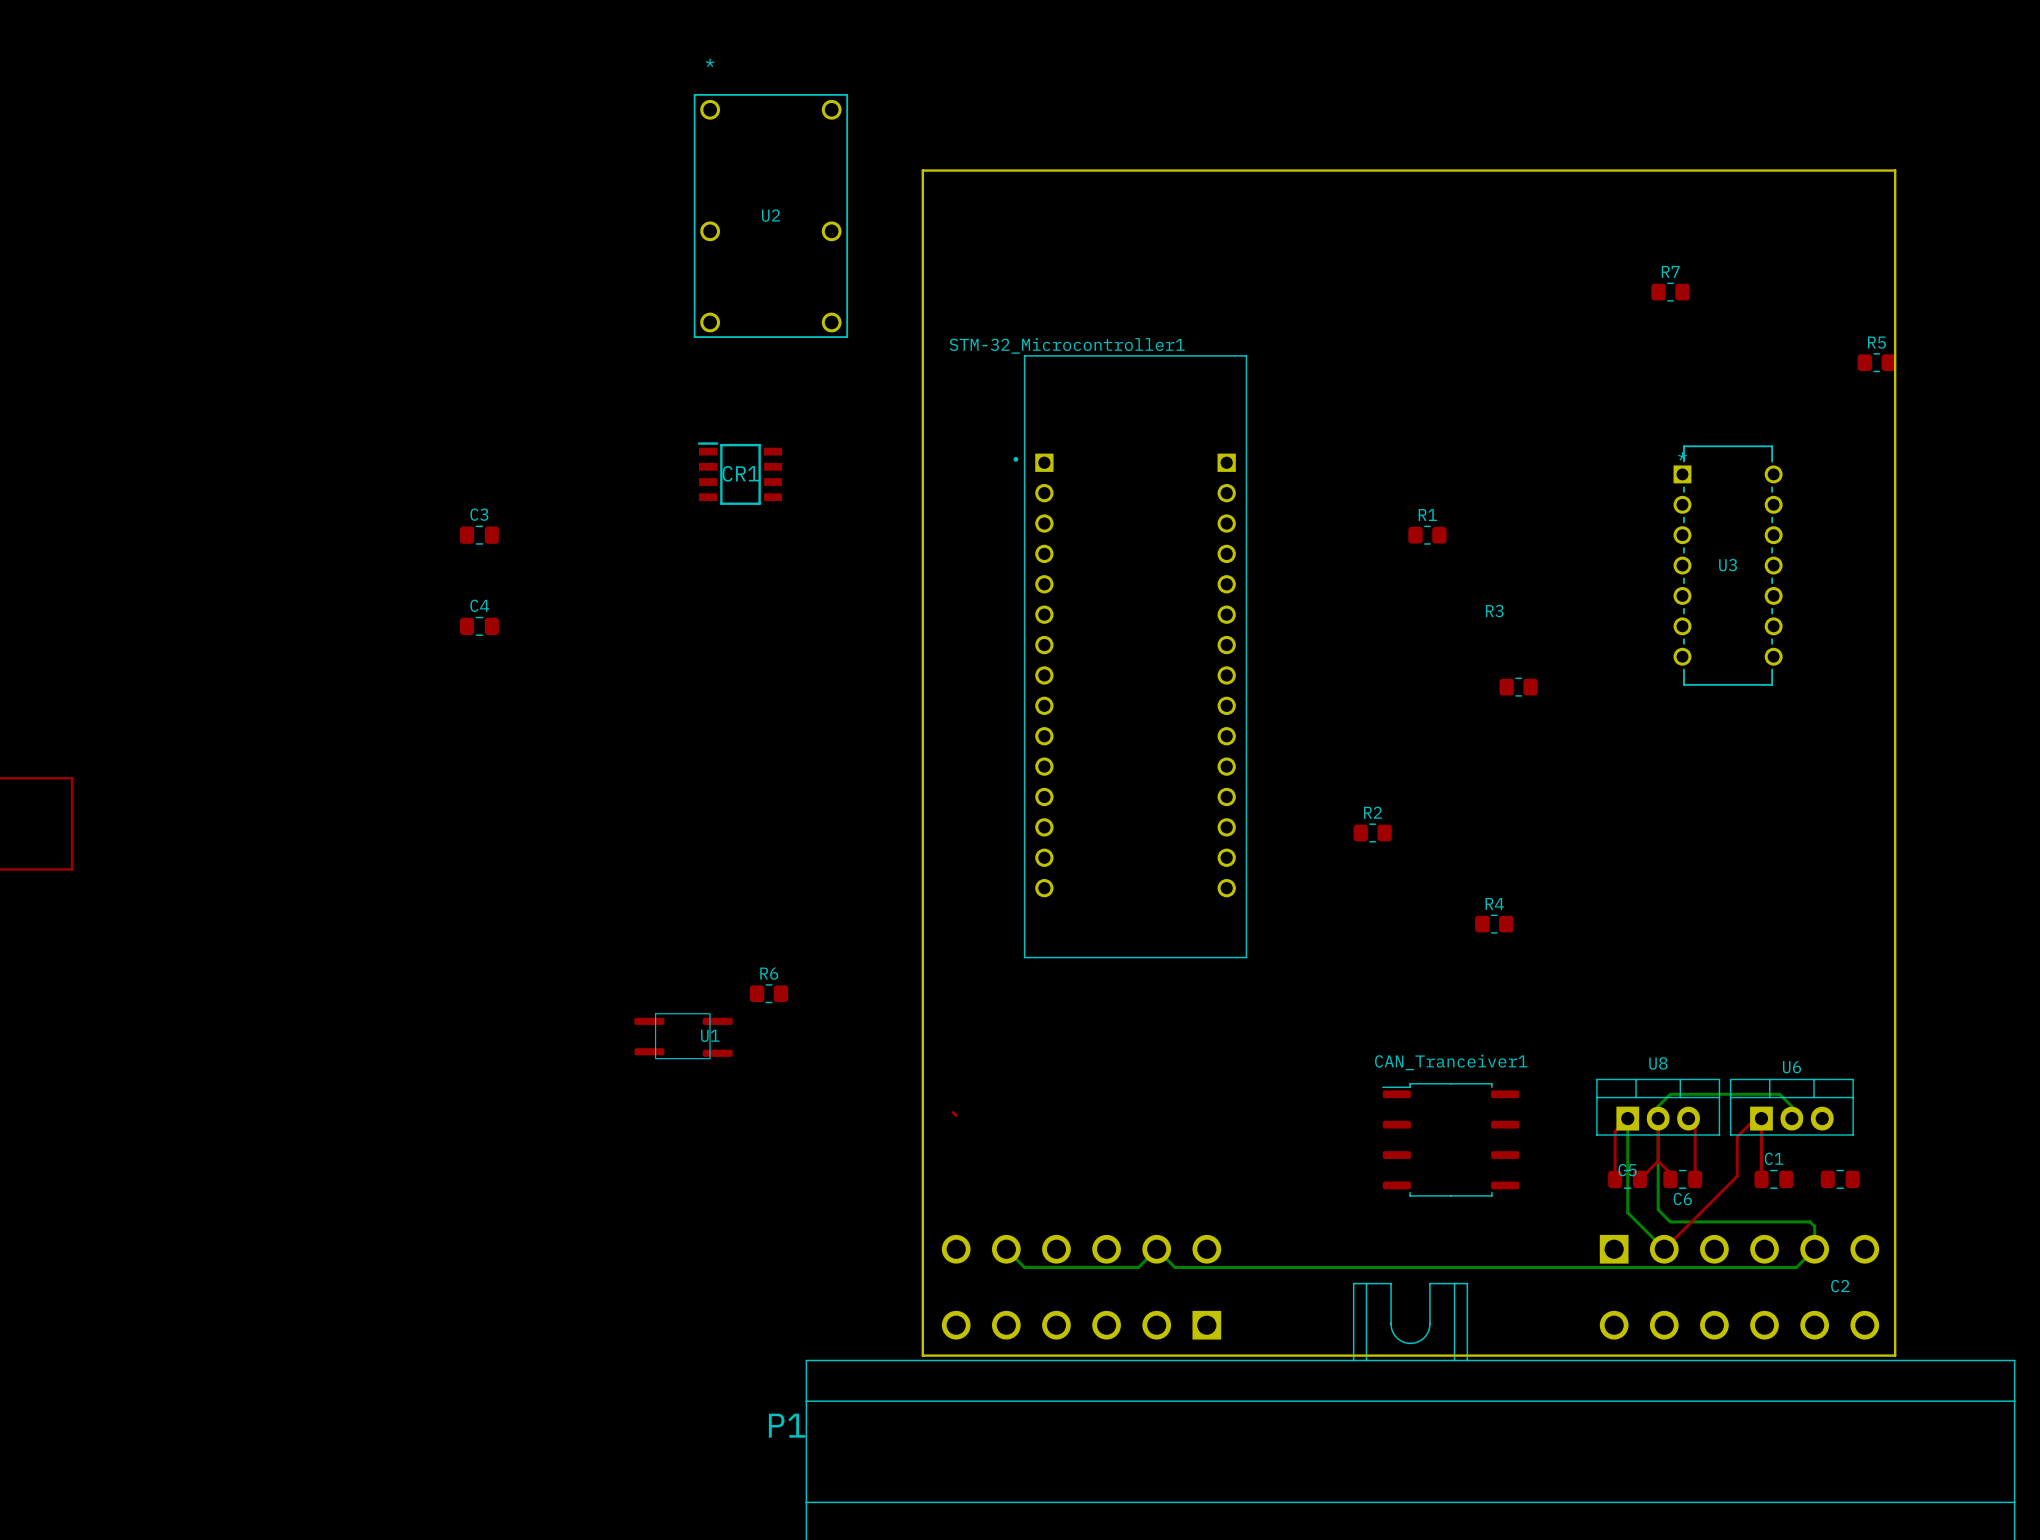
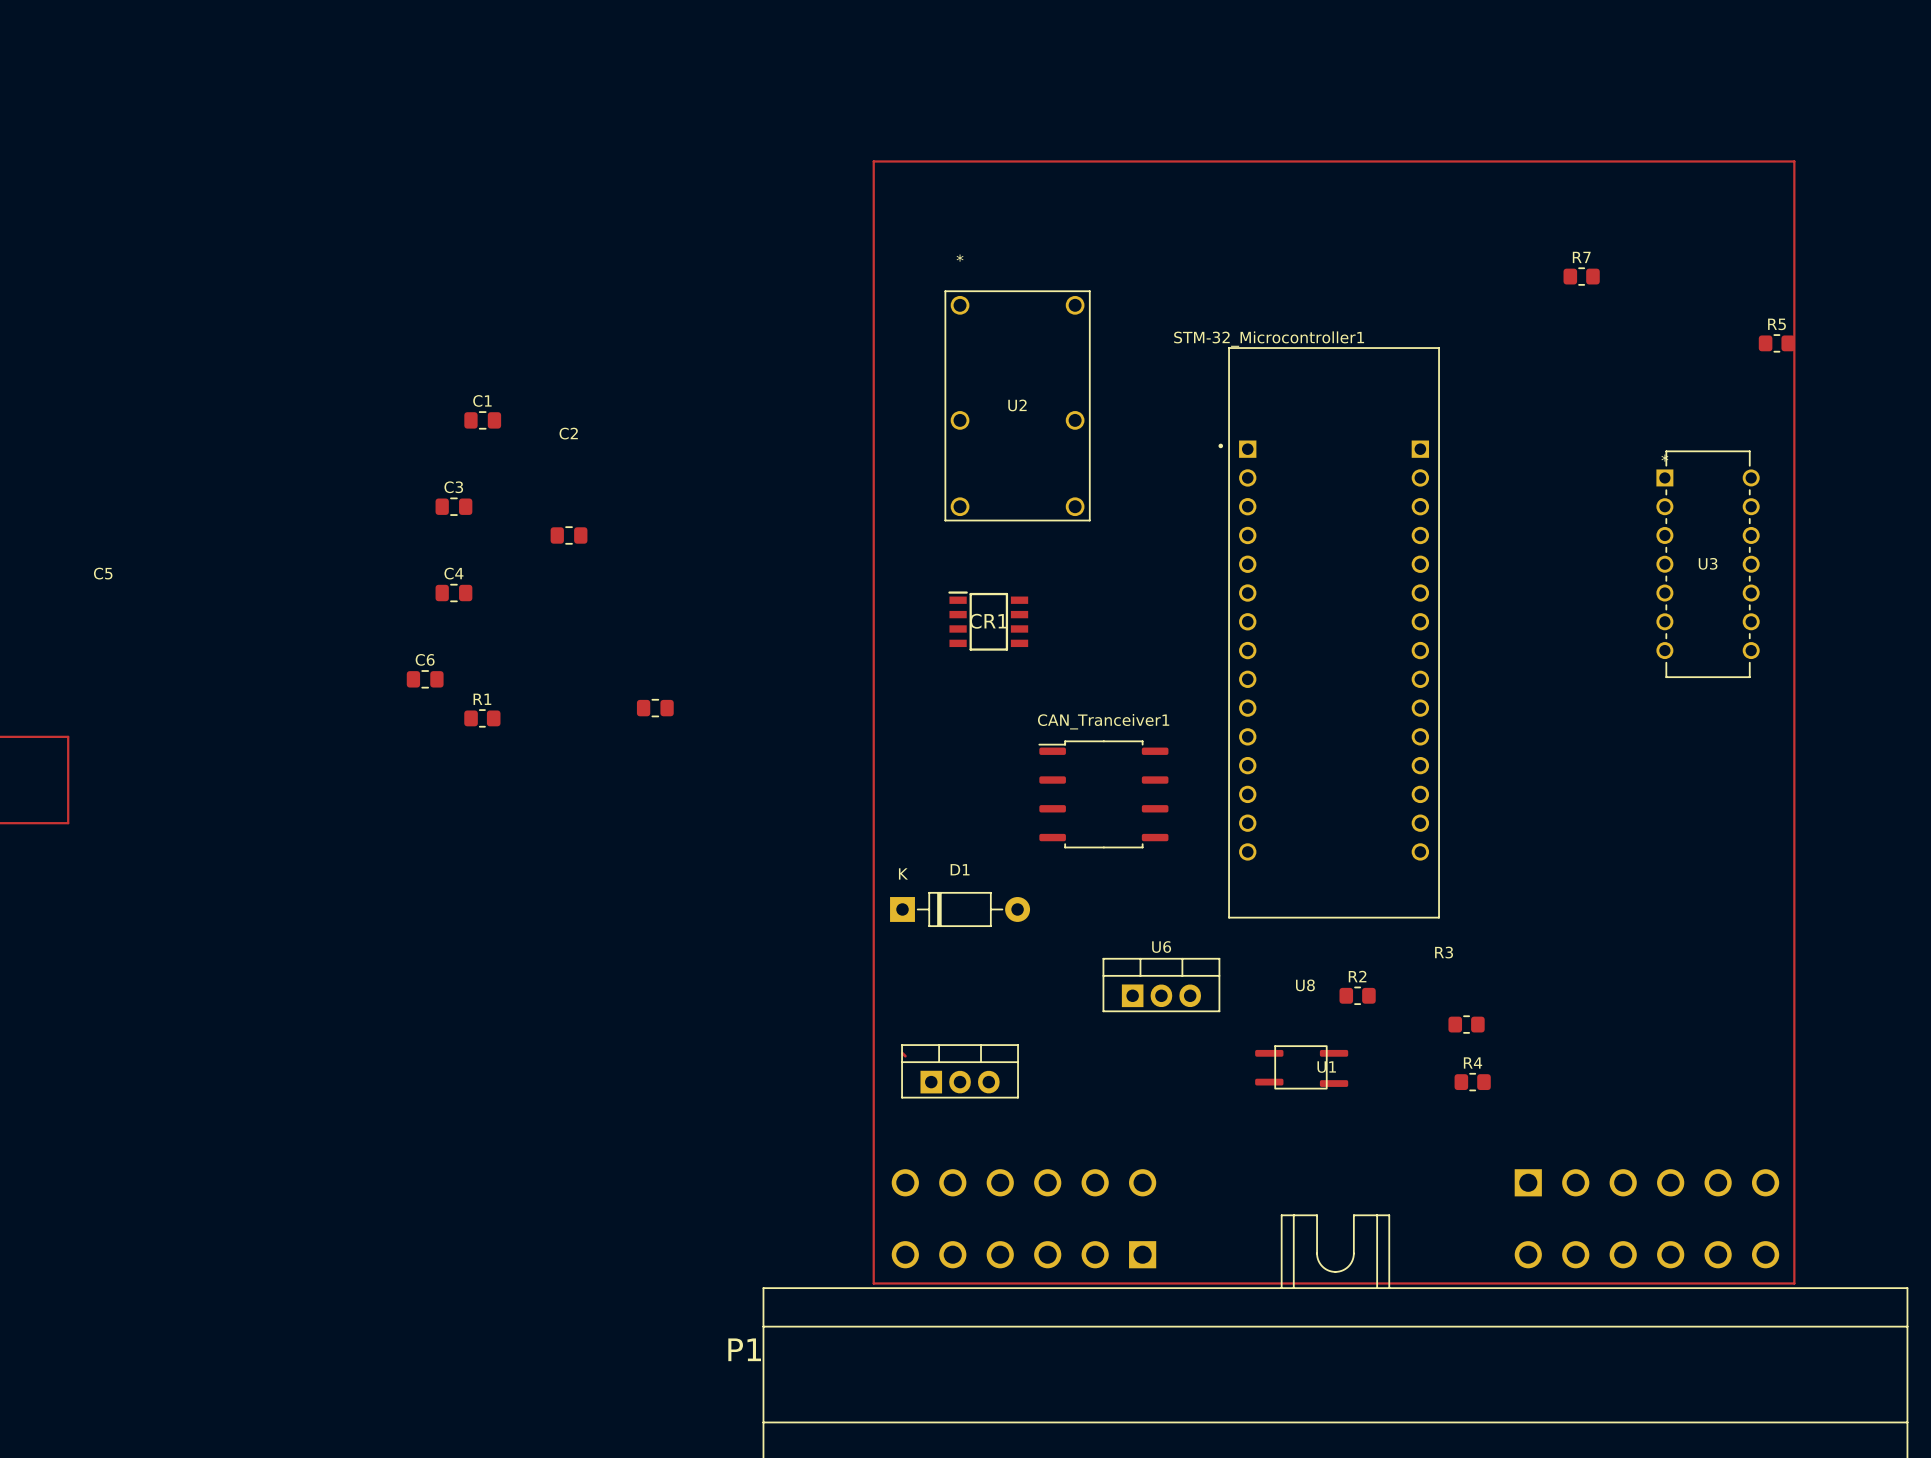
top track: none -> (873, 161) (1794, 161) (1794, 1283) (873, 1283) (873, 161)
board edge: (922, 170) (1895, 170) (1895, 1355) (922, 1355) (922, 170) -> none
U2 position: (770, 215) -> (1017, 405)
CR1 position: (739, 473) -> (988, 621)
R1 position: (1427, 535) -> (482, 718)
U3 position: (1728, 565) -> (1708, 564)
STM-32_Microcontroller1 position: (1130, 656) -> (1329, 632)
R3 position: (1518, 687) -> (1466, 1024)
R2 position: (1372, 832) -> (1357, 995)
R4 position: (1494, 924) -> (1472, 1082)
D1: none -> (960, 909)
R6: (768, 993) -> none
U1 position: (683, 1036) -> (1301, 1067)
U8 name position: U8 (1658, 1063) -> U8 (1305, 985)
U8 position: (1658, 1107) -> (960, 1071)
U6 position: (1791, 1107) -> (1161, 985)
top track: (1627, 1118) (1615, 1131) (1615, 1179) -> none
bottom track: (1627, 1118) (1627, 1212) (1664, 1249) -> none
top track: (1658, 1118) (1658, 1161) -> none
top track: (1688, 1118) (1695, 1125) (1695, 1179) -> none
bottom track: (1791, 1118) (1791, 1106) (1779, 1094) (1670, 1094) (1658, 1106) (1658, 1209) (1670, 1221) (1810, 1221) (1814, 1226) (1814, 1249) (1796, 1267) (1174, 1267) (1156, 1249) (1138, 1267) (1024, 1267) (1006, 1249) -> none
CAN_Tranceiver1 position: (1450, 1139) -> (1103, 794)
top track: (1658, 1161) (1639, 1179) -> none
top track: (1658, 1161) (1670, 1173) (1670, 1179) -> none
C5 name position: C5 (1627, 1170) -> C5 (103, 573)
C5 position: (1627, 1179) -> (655, 708)
C6 position: (1682, 1179) -> (425, 679)
top track: (1761, 1179) (1761, 1118) (1755, 1118) (1737, 1136) (1737, 1176) (1664, 1249) -> none
C1 position: (1773, 1179) -> (482, 420)
C2 position: (1840, 1179) -> (569, 535)
C6 name position: C6 (1682, 1199) -> C6 (425, 659)
C2 name position: C2 (1840, 1286) -> C2 (568, 433)

